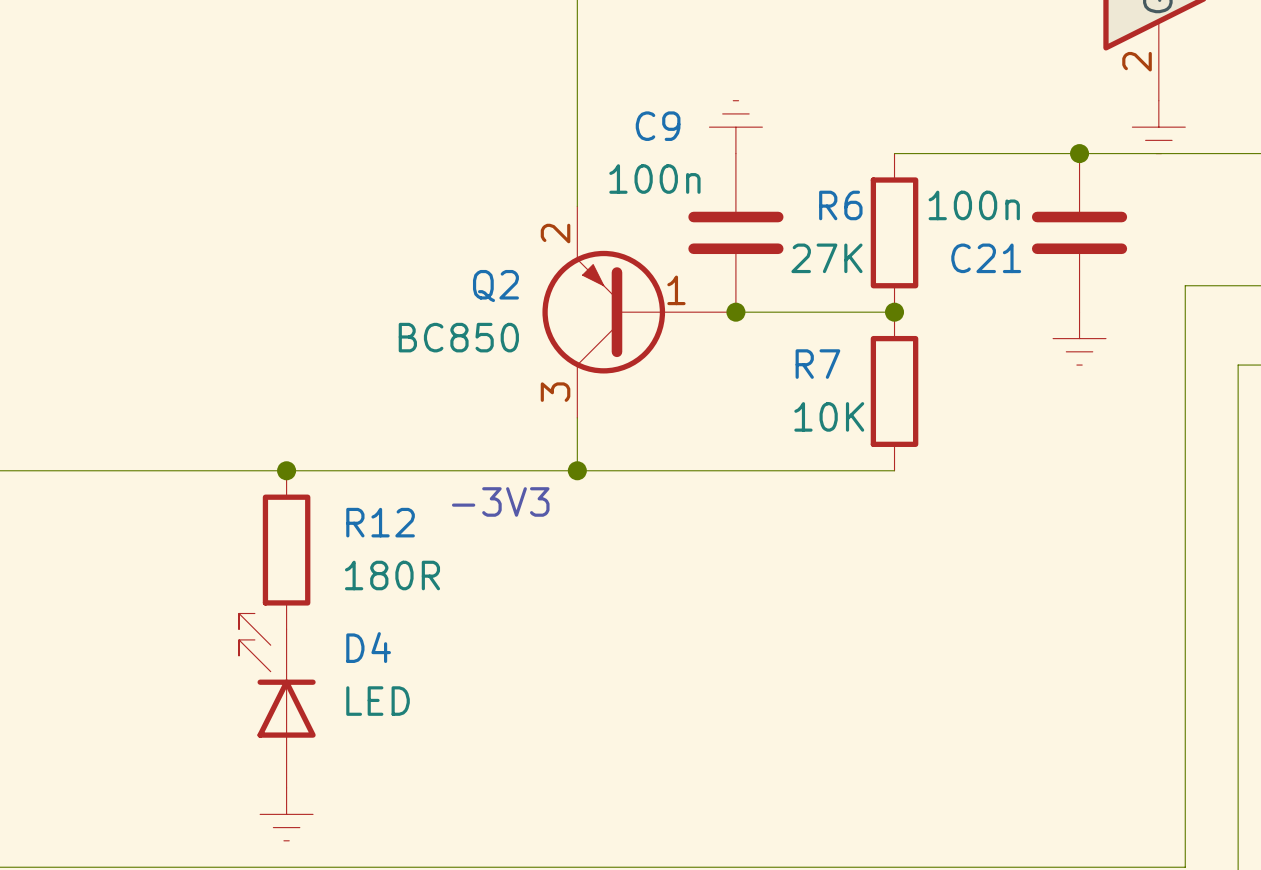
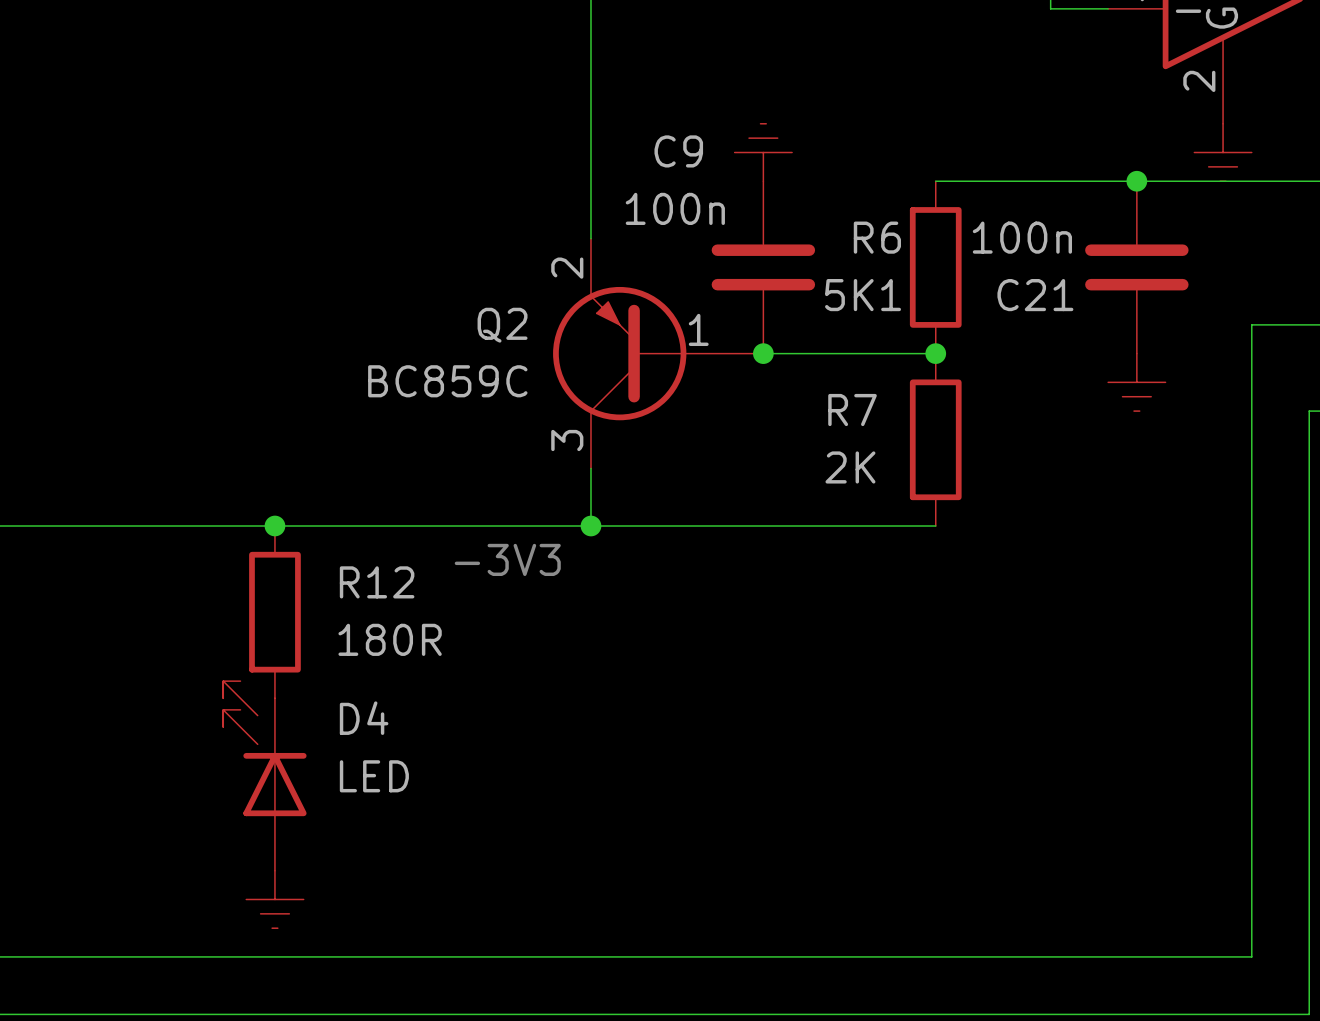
R6 value: 27K (826, 258) -> 5K1 (863, 295)
Q2 value: BC850 (458, 337) -> BC859C (447, 381)
R7 value: 10K (829, 416) -> 2K (850, 467)

